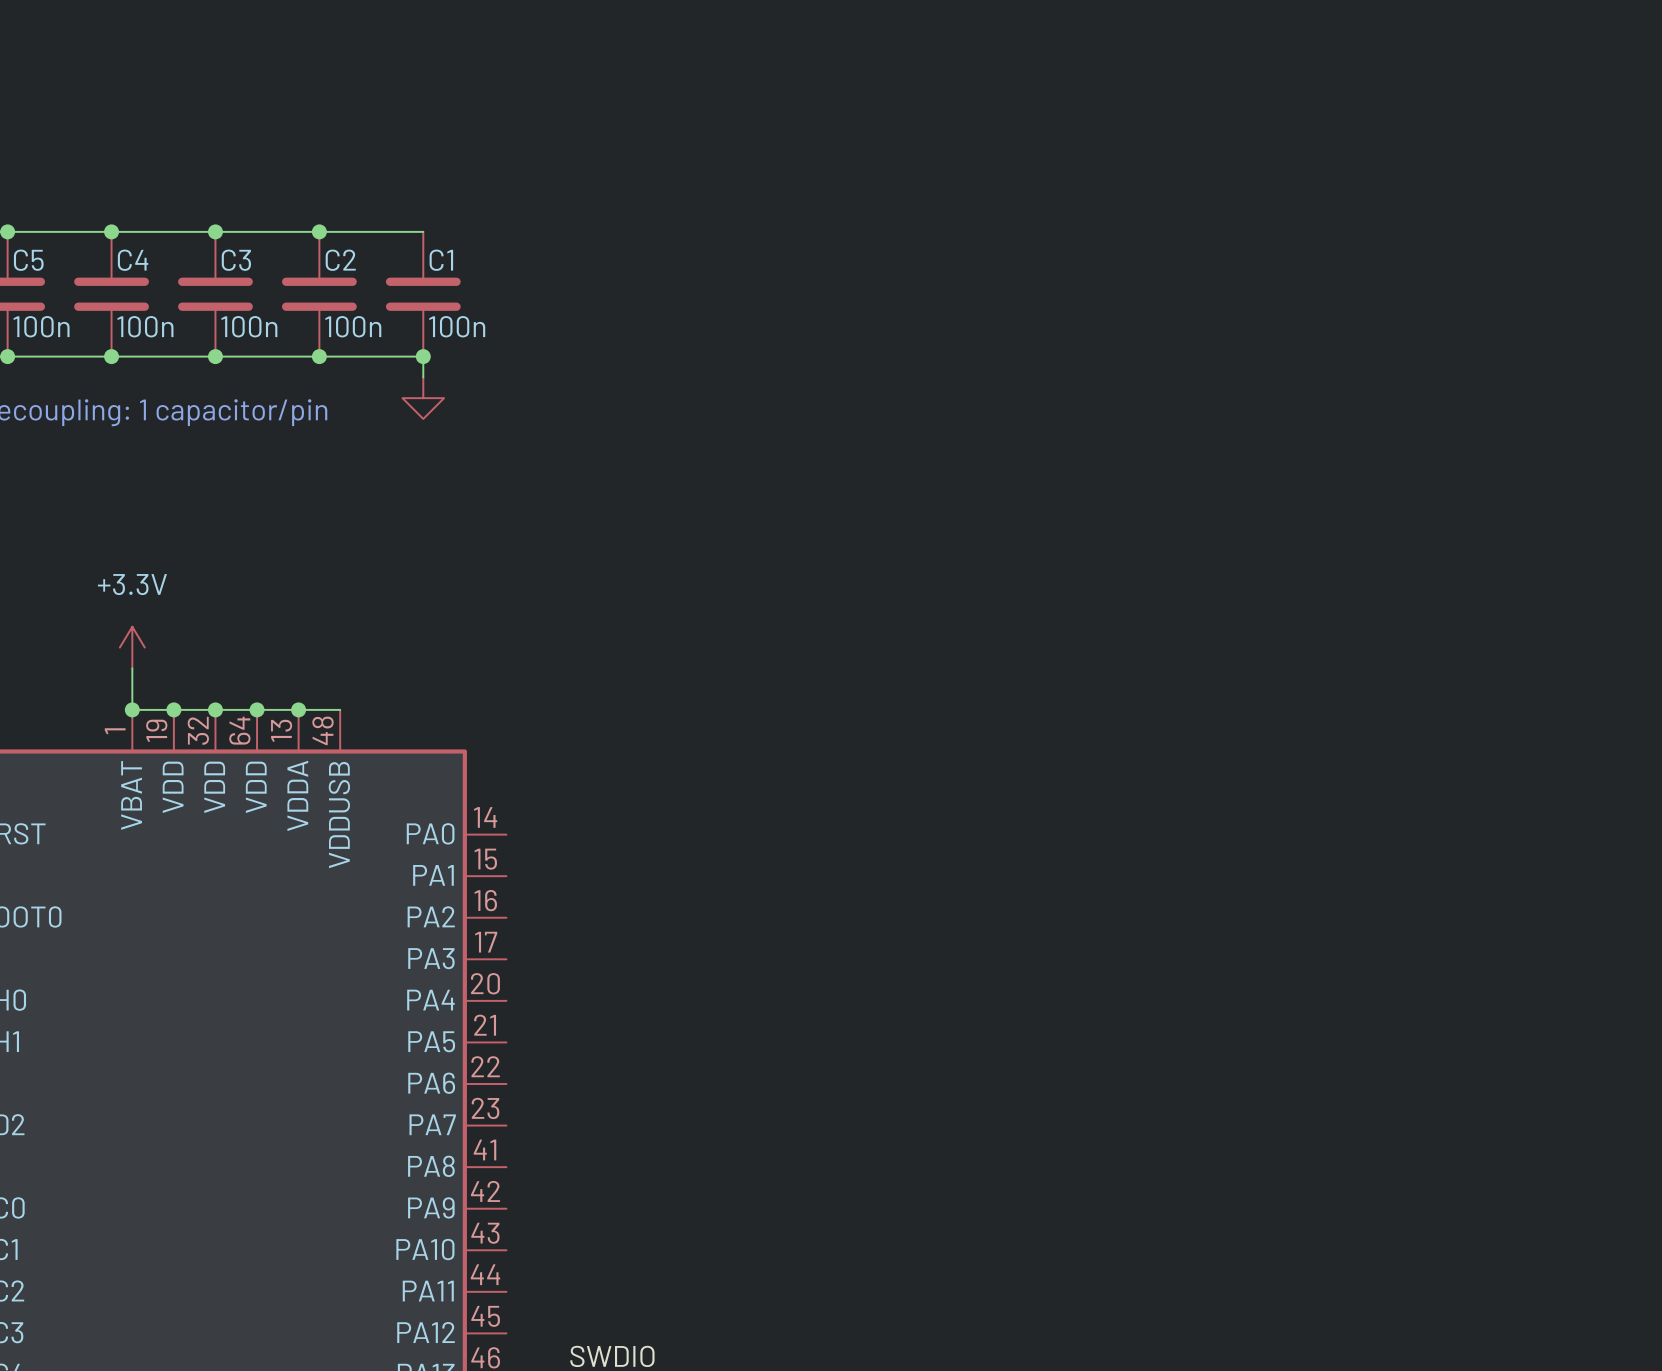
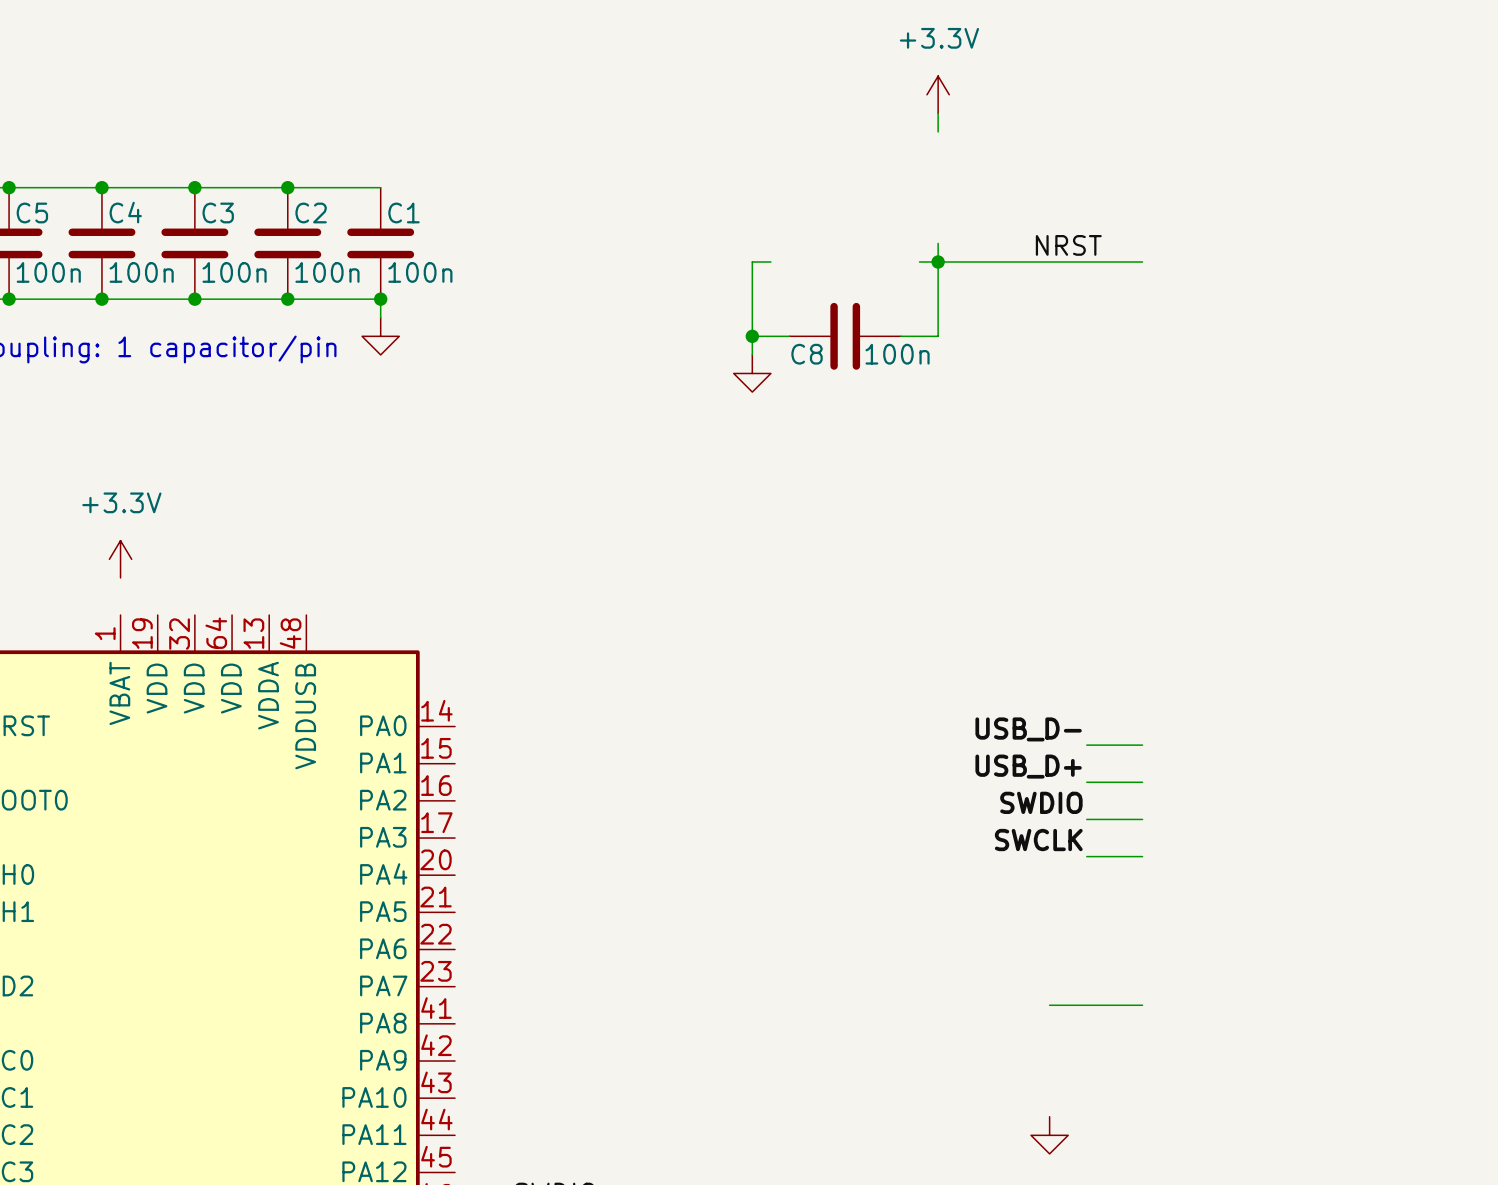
power symbol: none -> +3.3V (938, 94)
wire: none -> (938, 113) (938, 131)
wire: none -> (938, 243) (938, 336) (900, 336)
label: none -> NRST (1068, 245)
wire: none -> (770, 262) (752, 262) (752, 354)
wire: none -> (919, 262) (1142, 262)
junction: none -> (938, 262)
wire: none -> (752, 336) (789, 336)
junction: none -> (752, 336)
C8: none -> 100n (845, 336)
power symbol: none -> (752, 373)
wire: (132, 668) (132, 709) (340, 709) -> none
junction: (132, 709) -> none
junction: (173, 709) -> none
junction: (215, 709) -> none
junction: (257, 709) -> none
junction: (298, 709) -> none
label: none -> USB_D- (1028, 729)
wire: none -> (1086, 745) (1142, 745)
label: none -> USB_D+ (1028, 766)
wire: none -> (1086, 782) (1142, 782)
label: none -> SWDIO (1041, 802)
wire: none -> (1086, 819) (1142, 819)
label: none -> SWCLK (1038, 840)
wire: none -> (1086, 856) (1142, 856)
wire: none -> (1049, 1005) (1142, 1005)
power symbol: none -> (1049, 1135)

